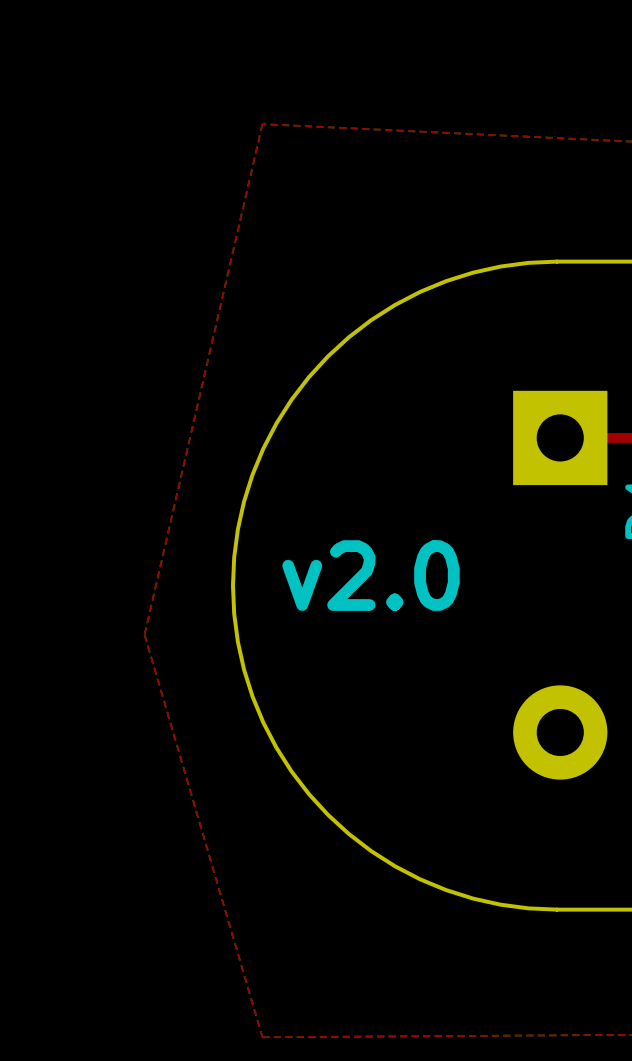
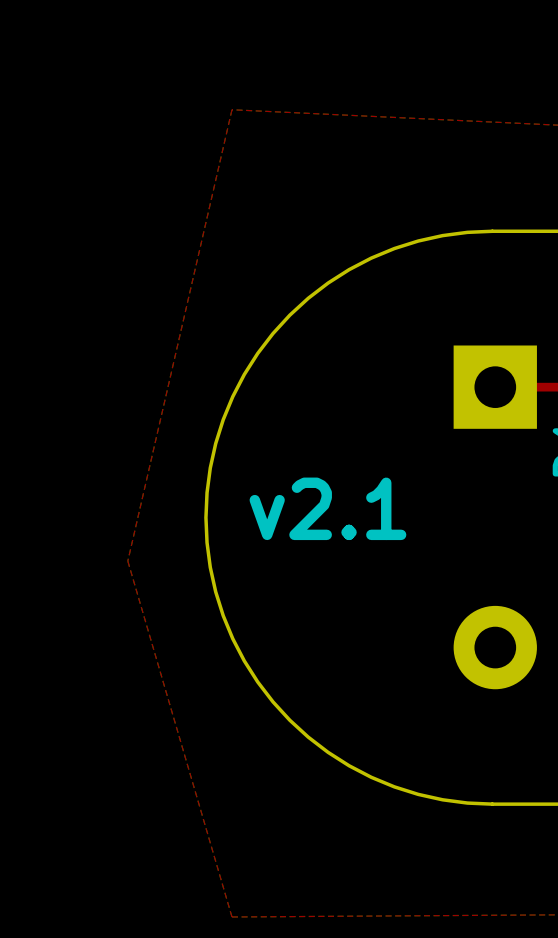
text: v2.0 (370, 575) -> v2.1 (327, 508)

